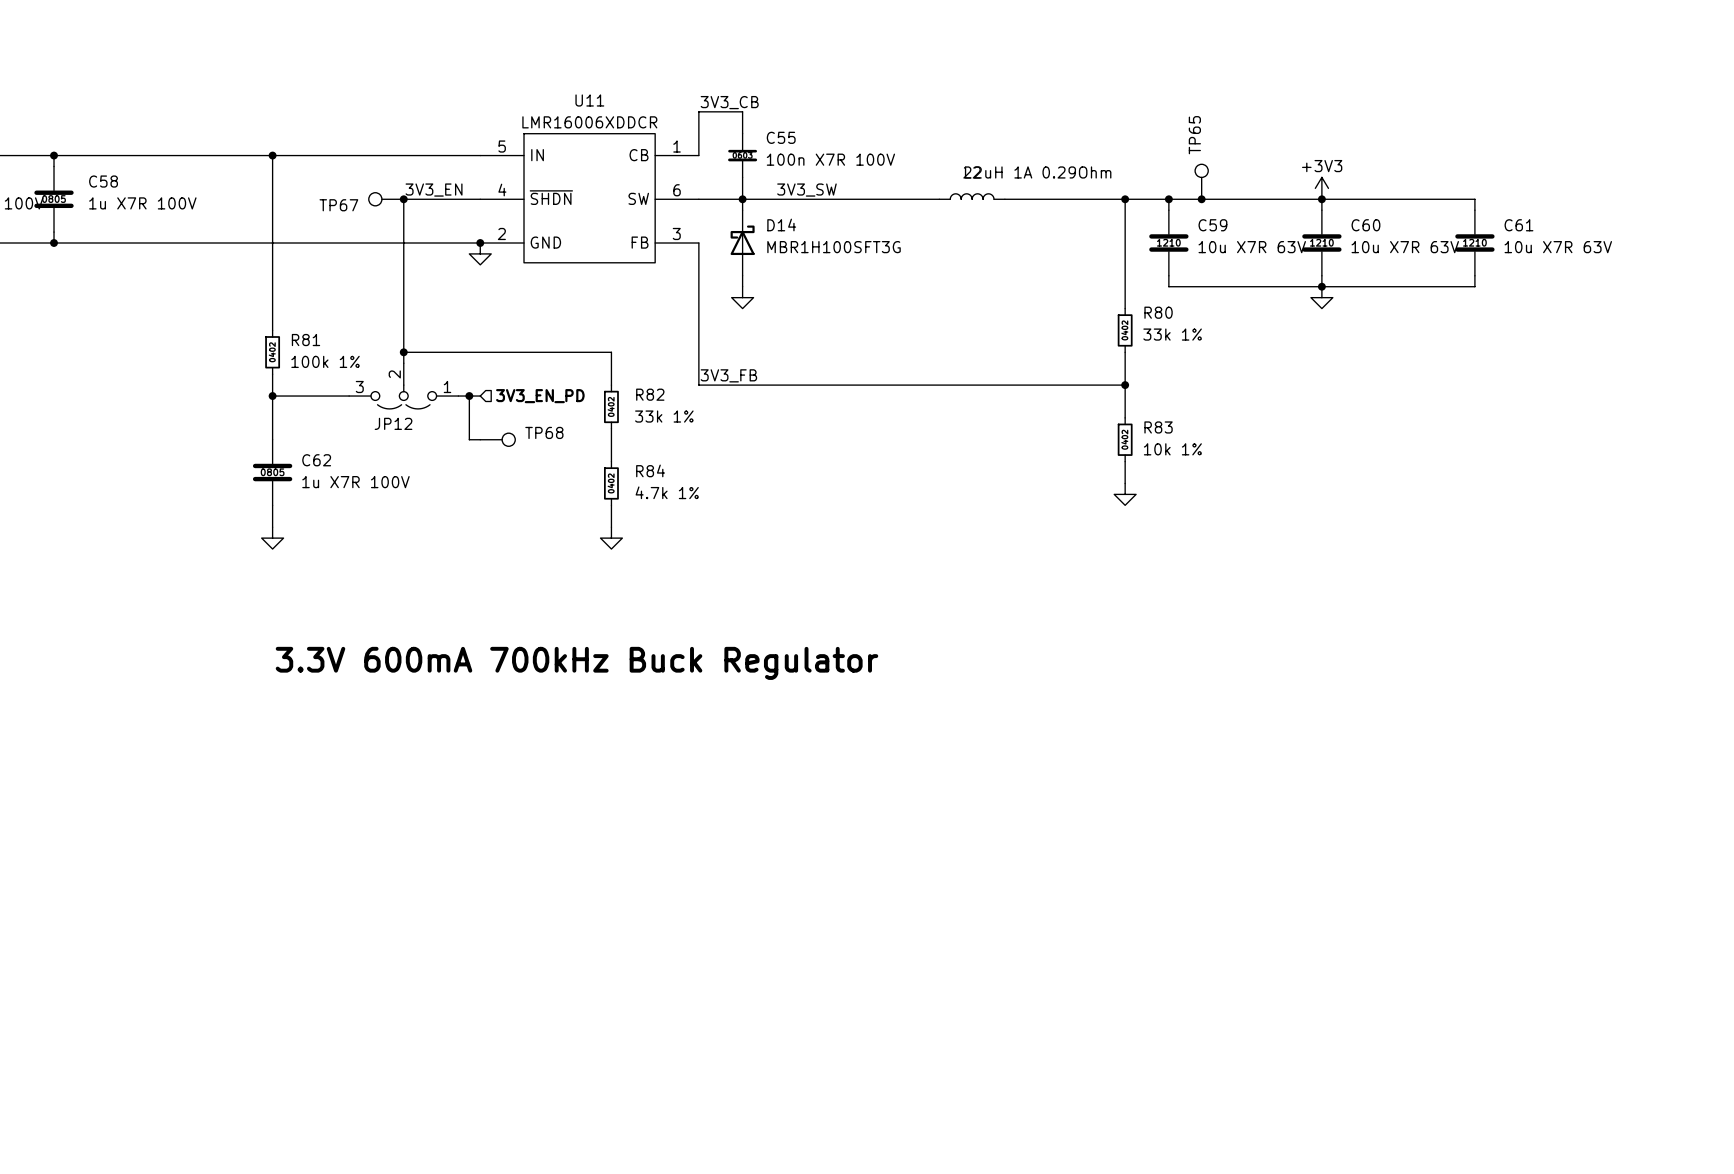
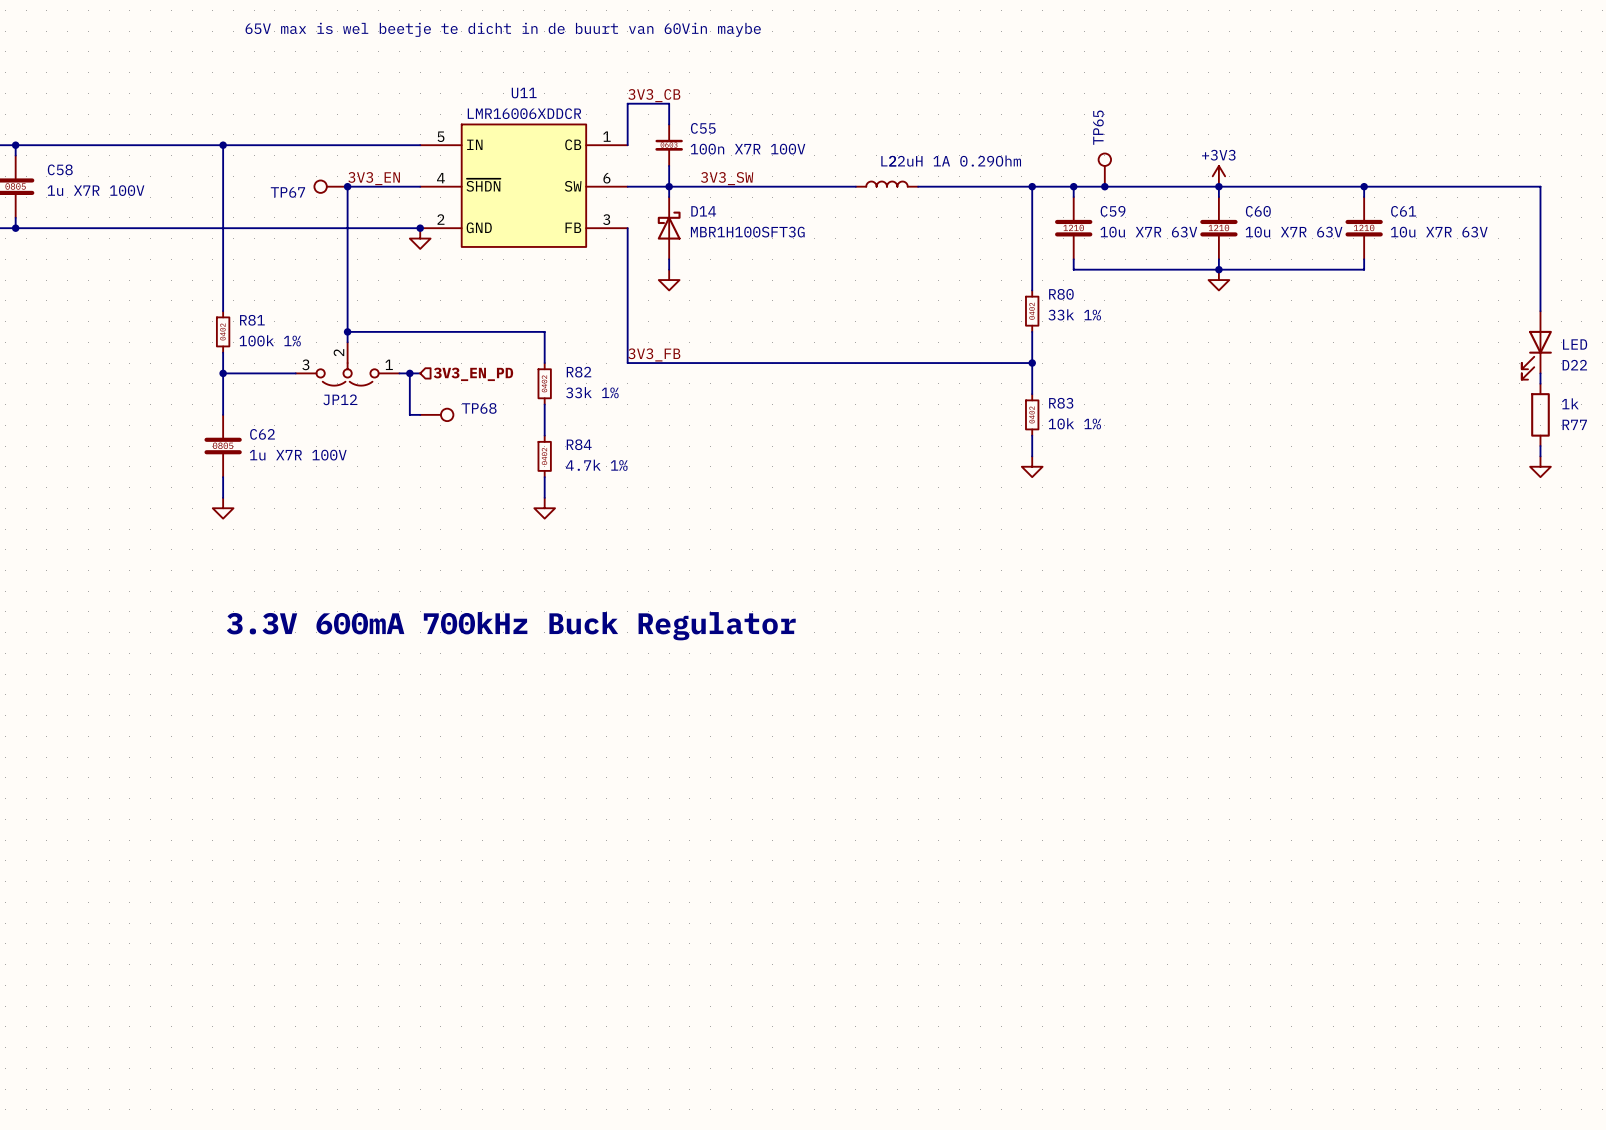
text: none -> 65V max is wel beetje te dicht in de buurt van 60Vin maybe (503, 29)
wire: none -> (1364, 186) (1540, 186) (1540, 311)
junction: none -> (1364, 186)
D22: none -> LED (1536, 345)
wire: none -> (1540, 373) (1540, 383)
R77: none -> 1k (1540, 414)
wire: none -> (1540, 446) (1540, 456)
power symbol: none -> (1540, 466)

